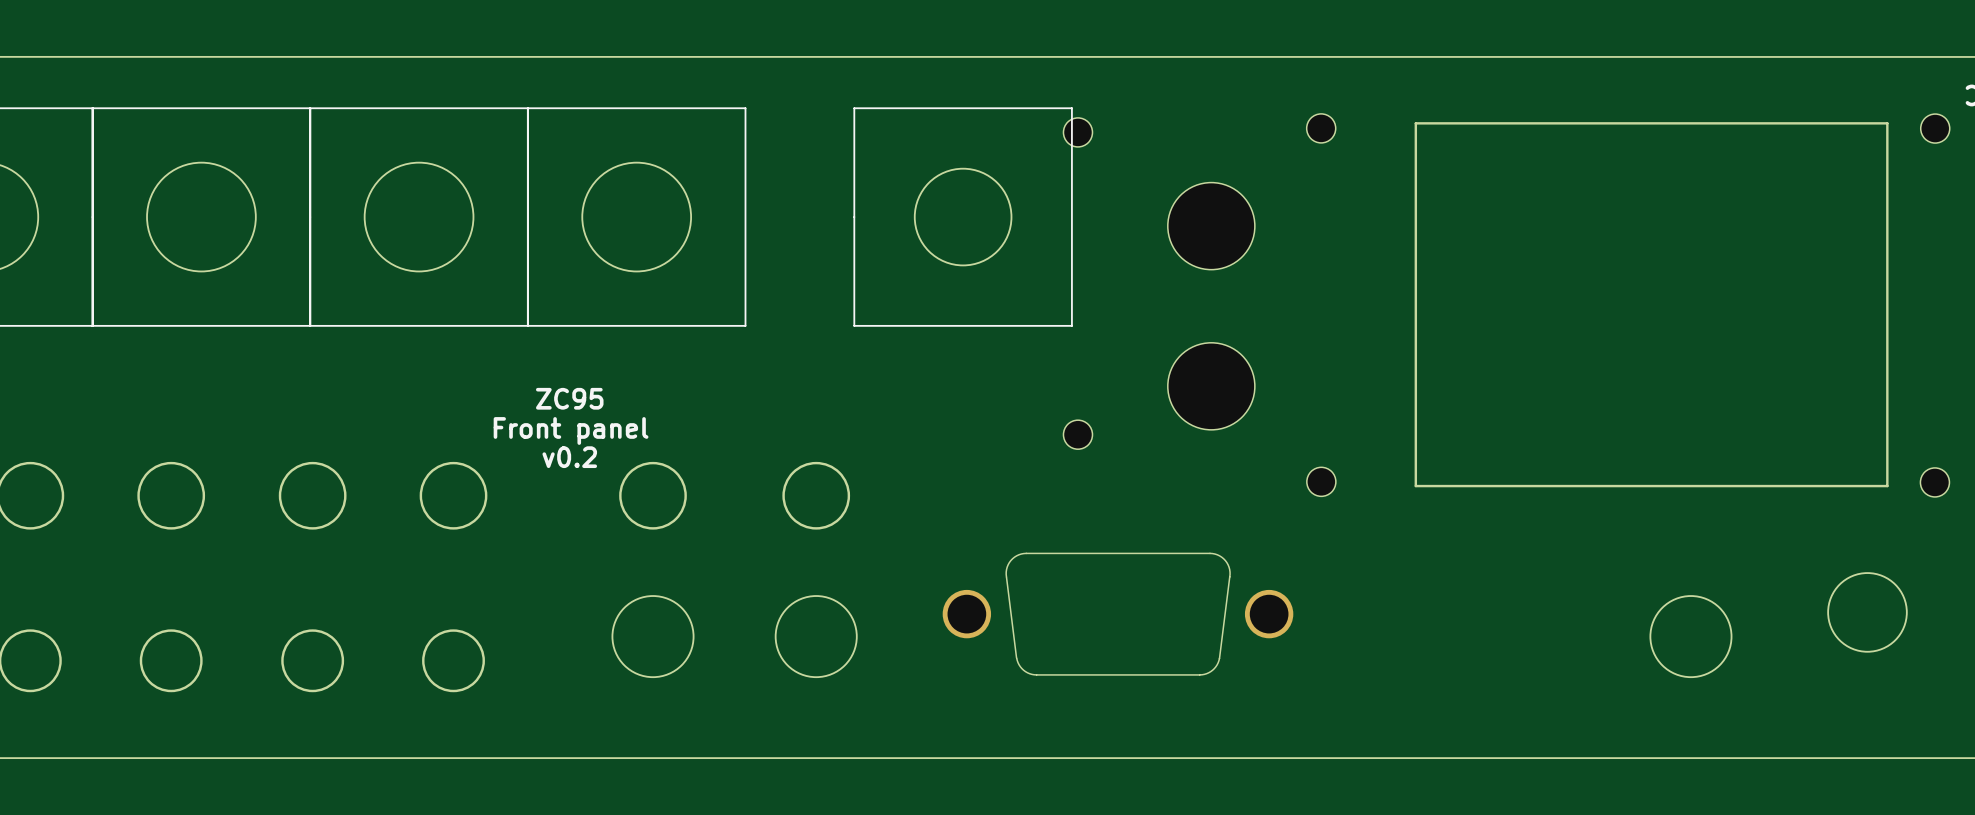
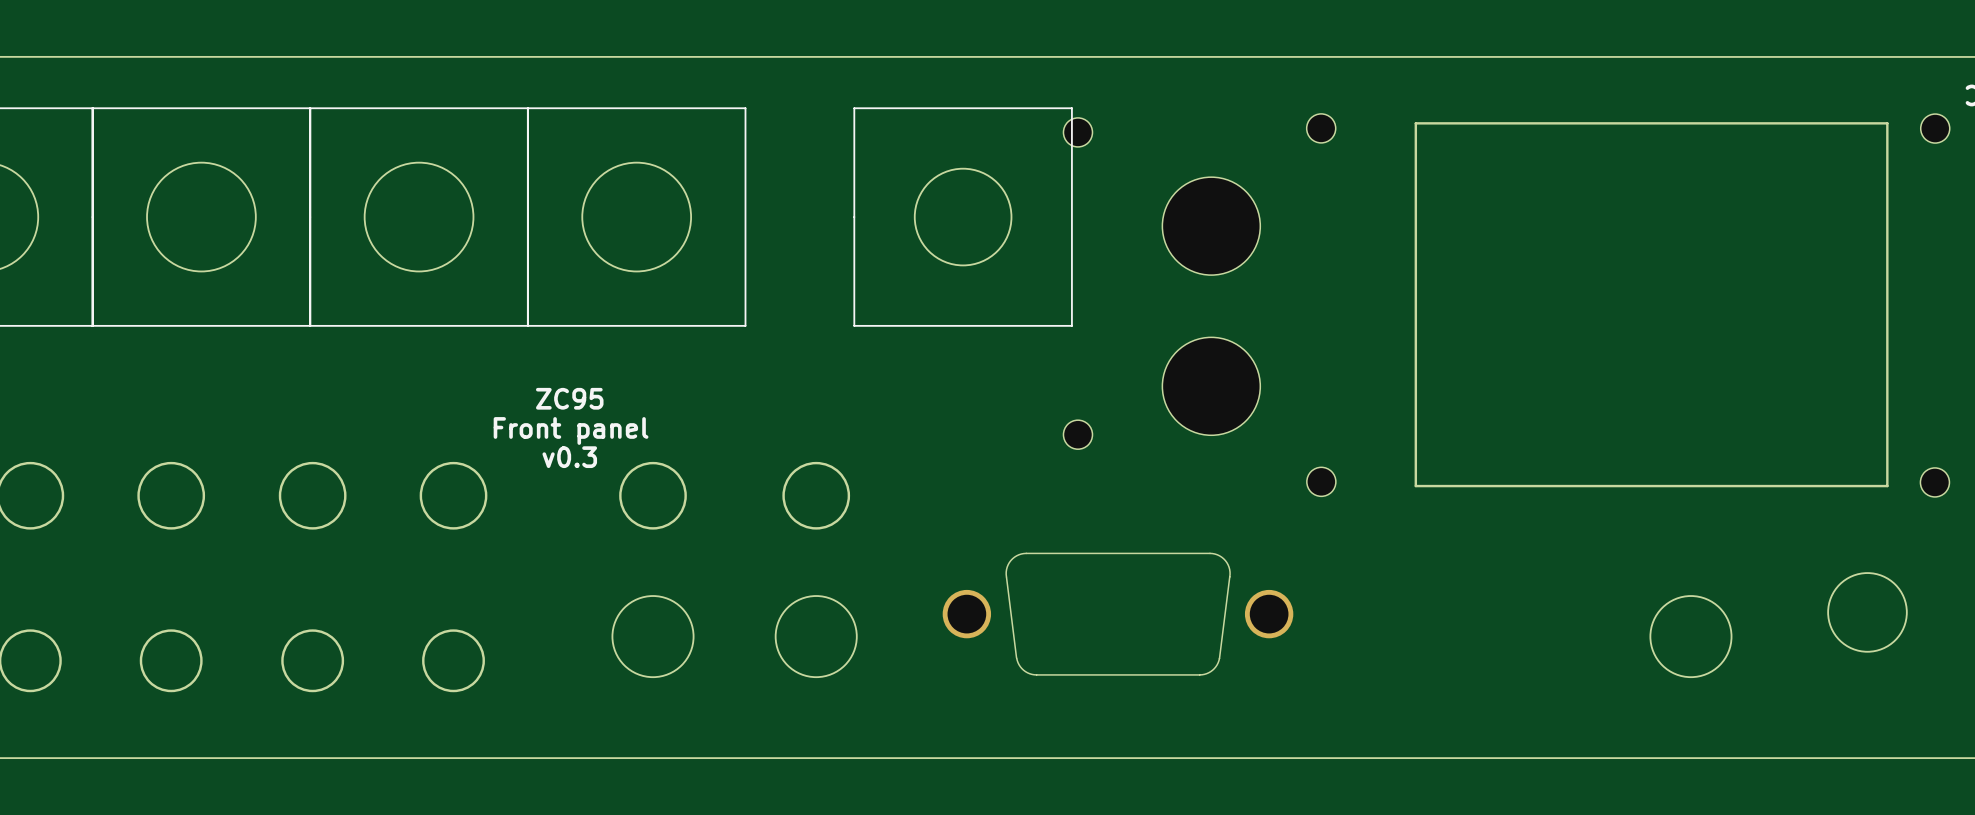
part footprint: [1167, 182, 1255, 270] -> [1162, 177, 1261, 276]
part footprint: [1167, 342, 1255, 430] -> [1162, 337, 1261, 436]
text: v0.2 (569, 457) -> v0.3 (569, 457)

